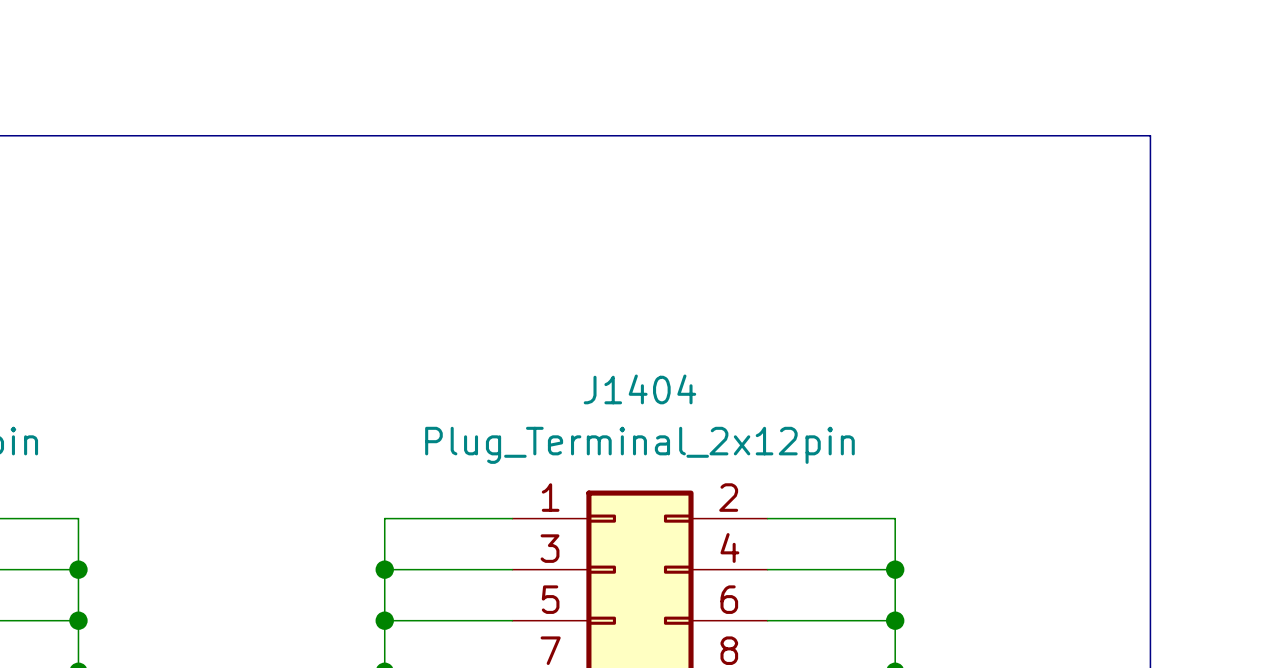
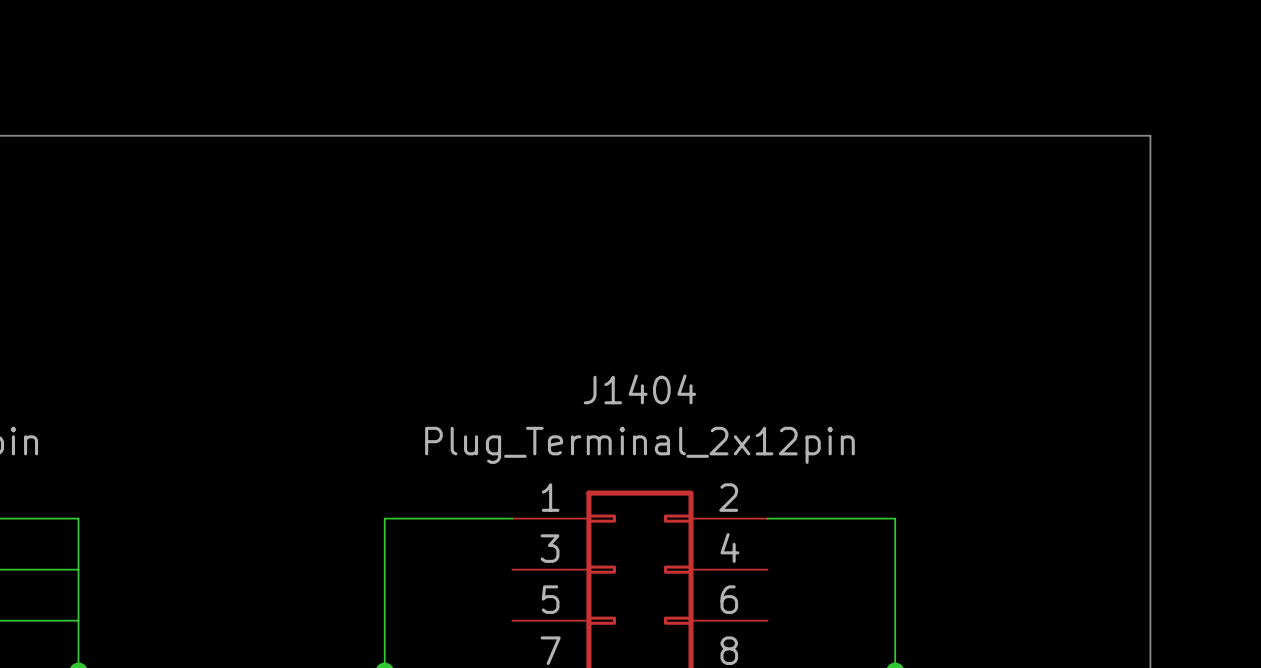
junction: (78, 569) -> none
wire: (384, 569) (512, 569) -> none
junction: (384, 569) -> none
wire: (767, 569) (895, 569) -> none
junction: (895, 569) -> none
junction: (78, 620) -> none
wire: (384, 620) (512, 620) -> none
junction: (384, 620) -> none
wire: (767, 620) (895, 620) -> none
junction: (895, 620) -> none

